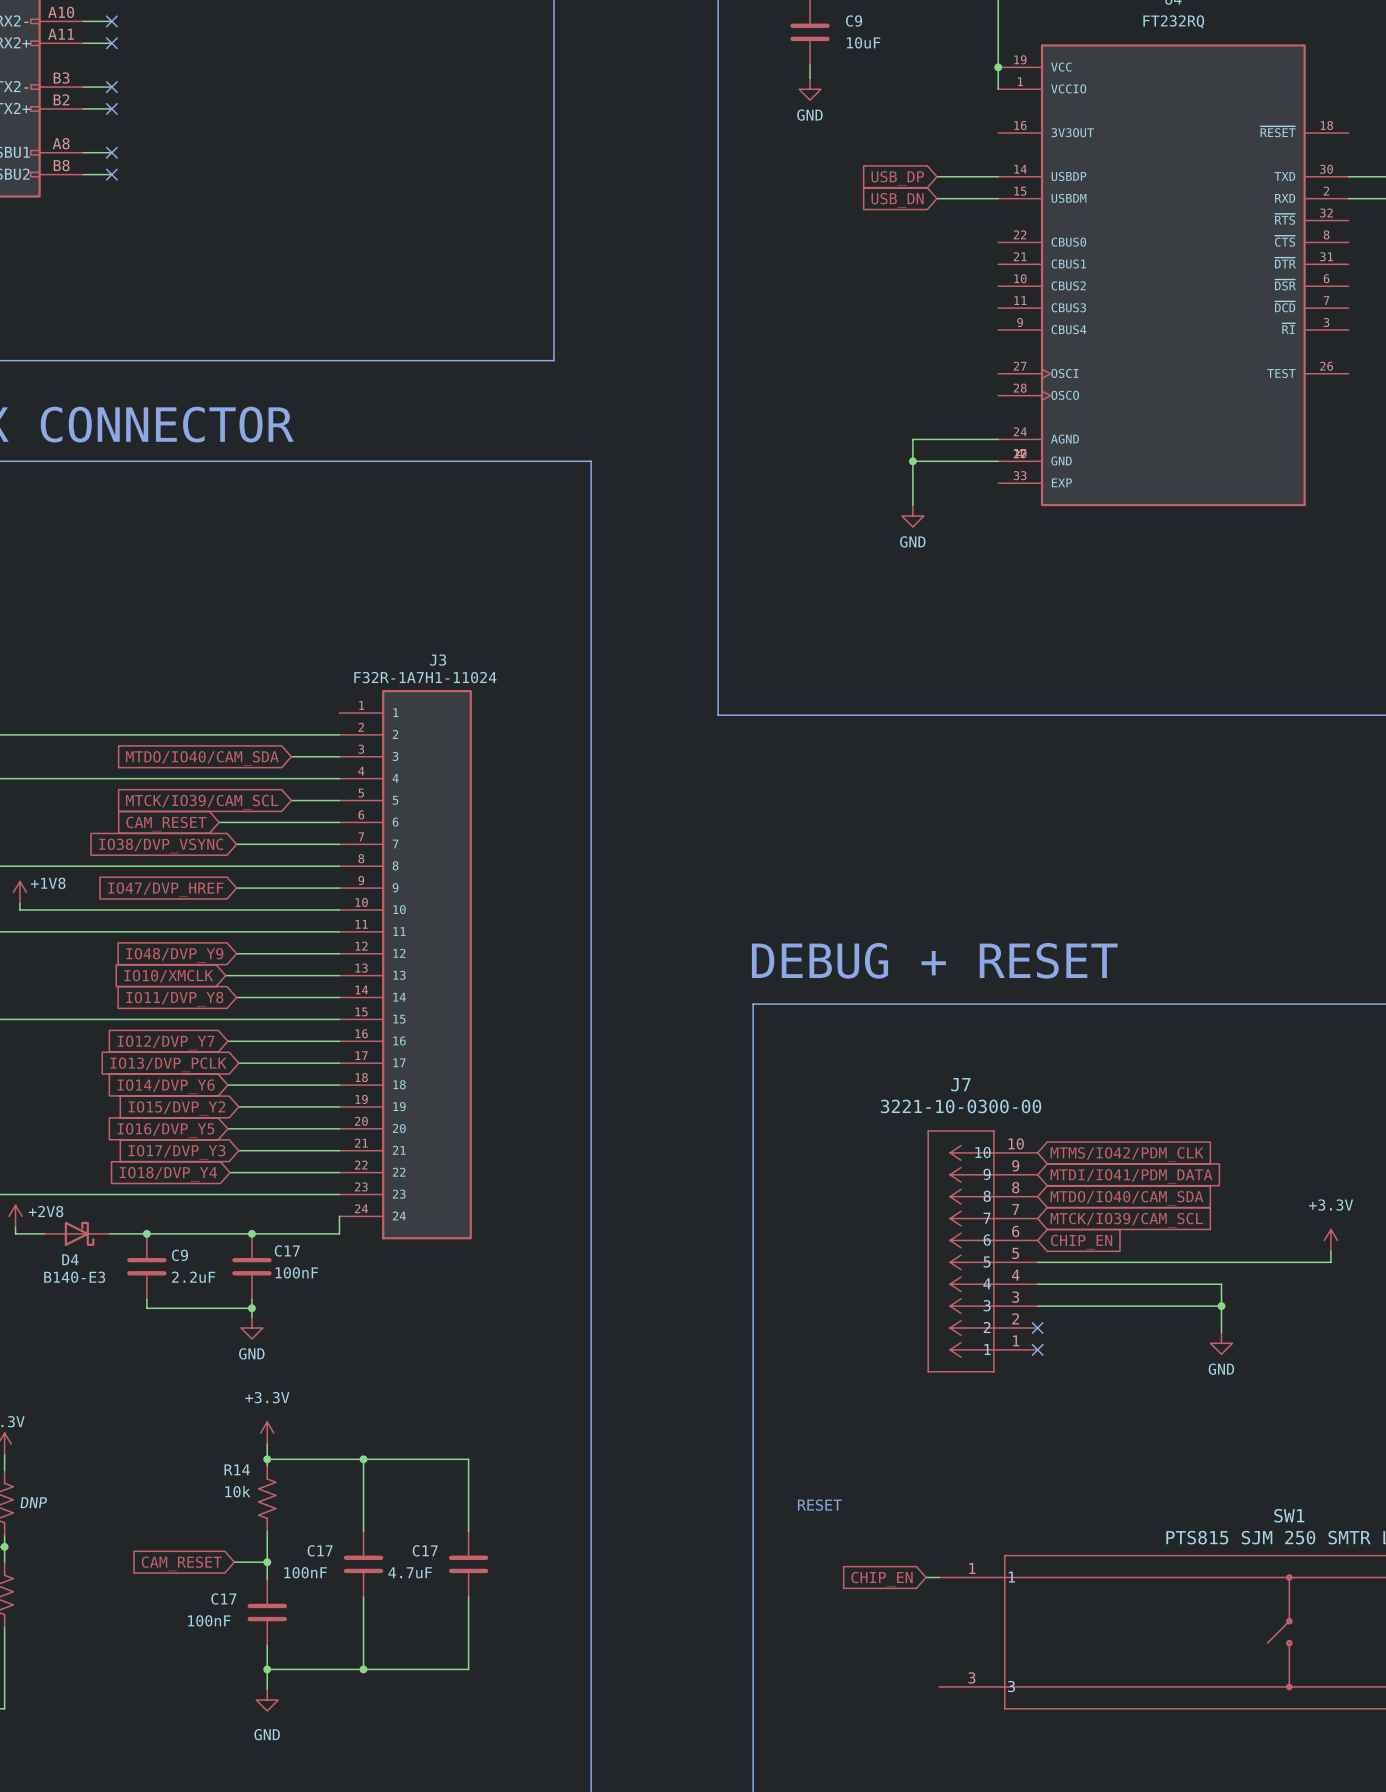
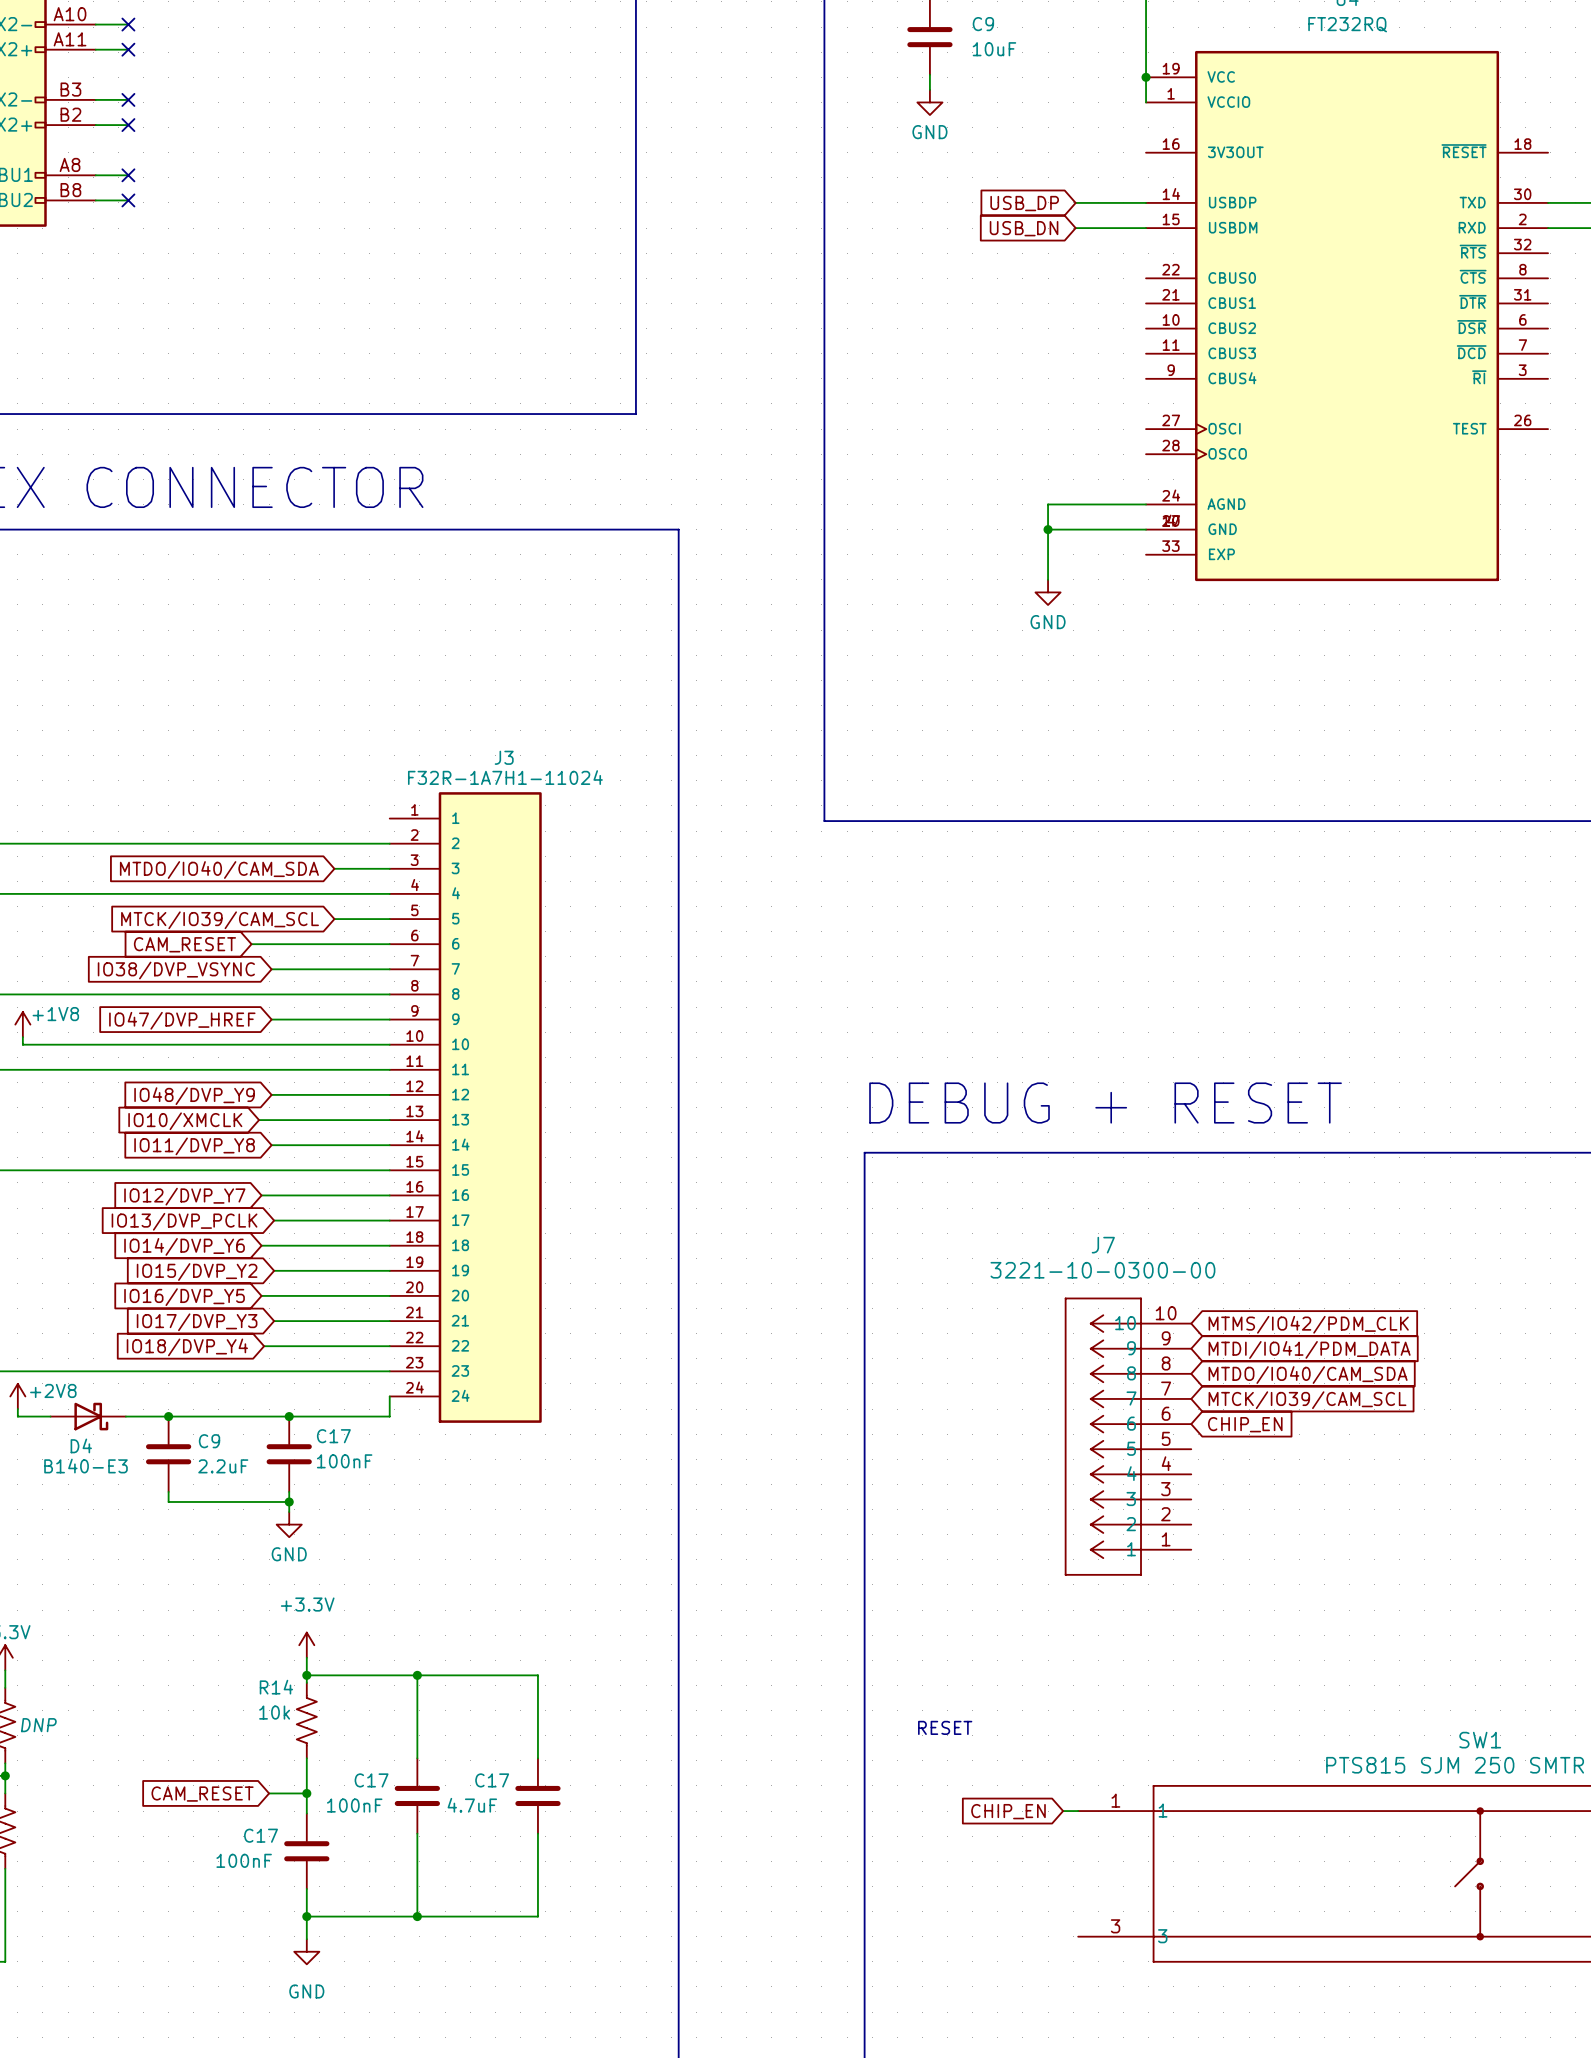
power symbol: +3.3V (1330, 1240) -> none
wire: (1330, 1251) (1330, 1262) (1037, 1262) -> none
wire: (1037, 1284) (1221, 1284) (1221, 1332) -> none
wire: (1037, 1306) (1221, 1306) -> none
junction: (1221, 1306) -> none
no-connect mark: (1037, 1328) -> none
power symbol: GND (1221, 1343) -> none
no-connect mark: (1037, 1349) -> none

